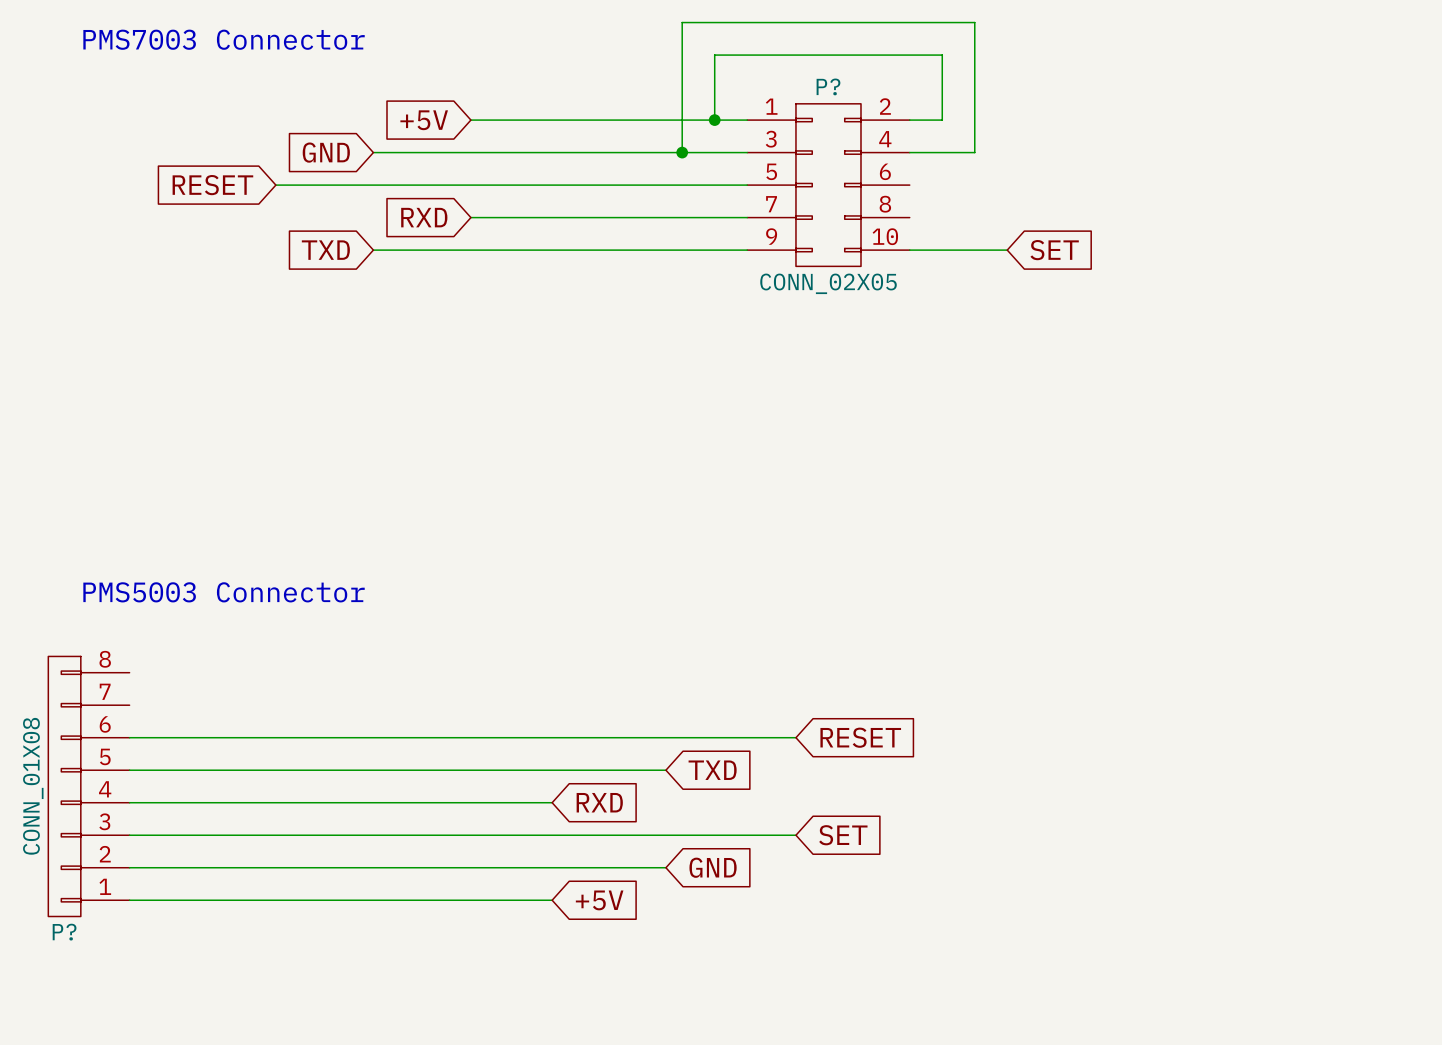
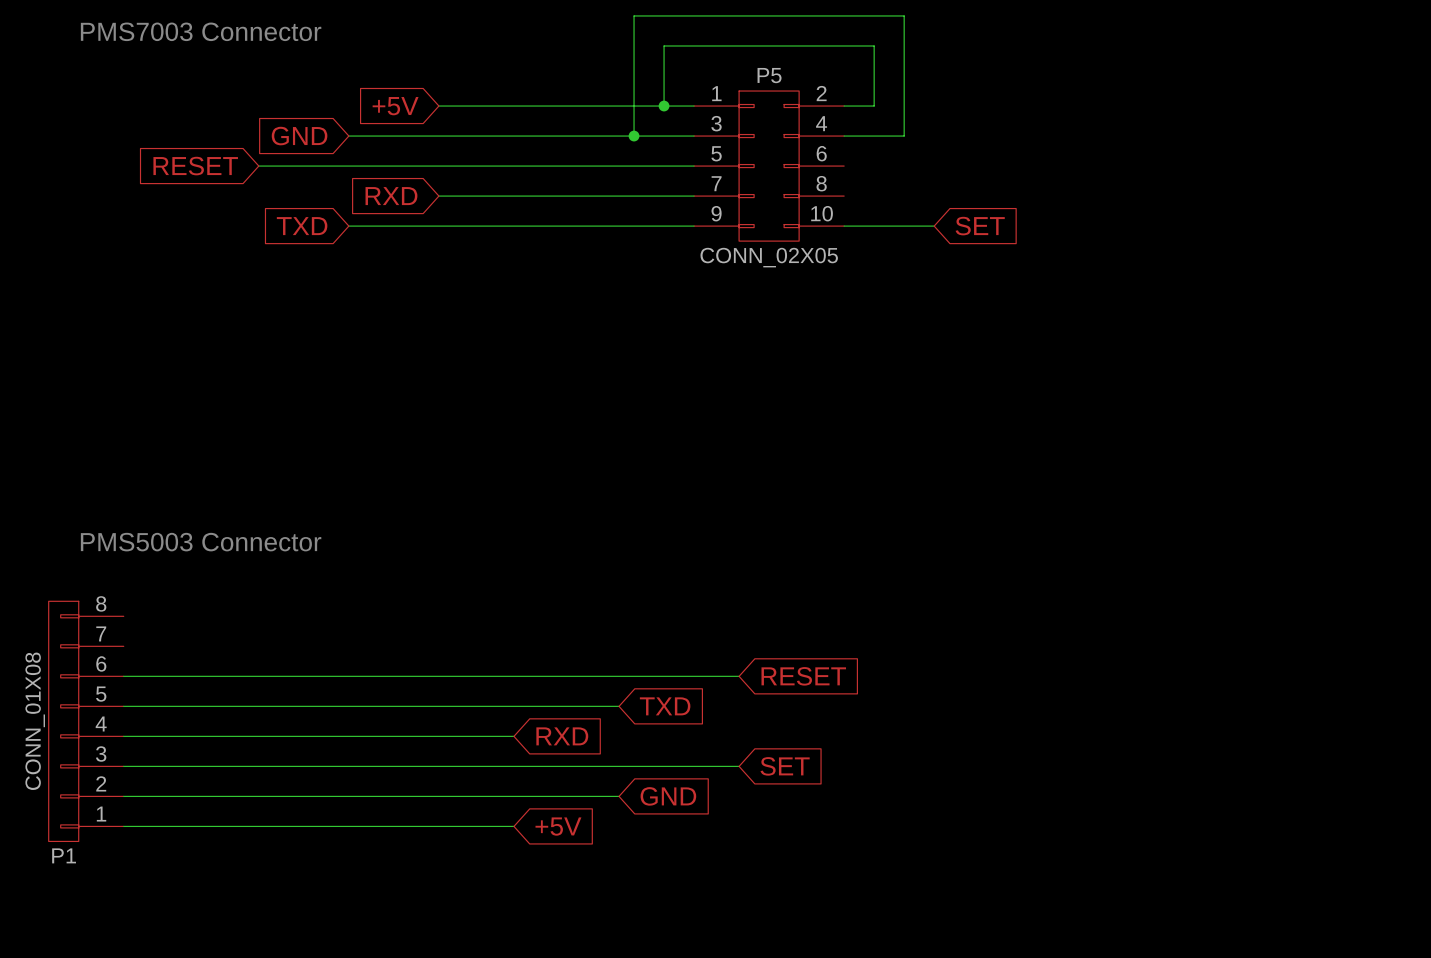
P? name: P? (828, 86) -> P5 (769, 75)
P? name: P? (64, 932) -> P1 (64, 855)

